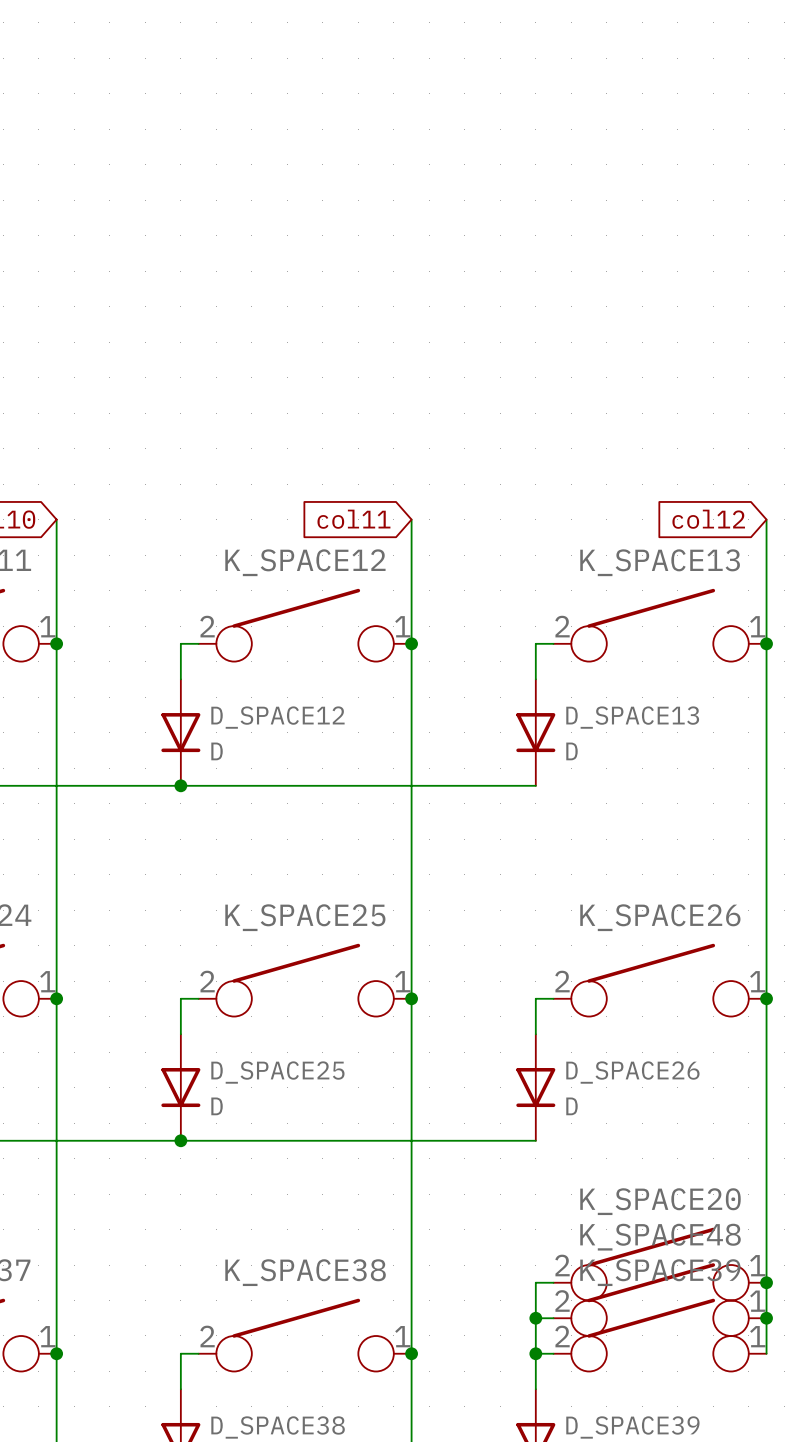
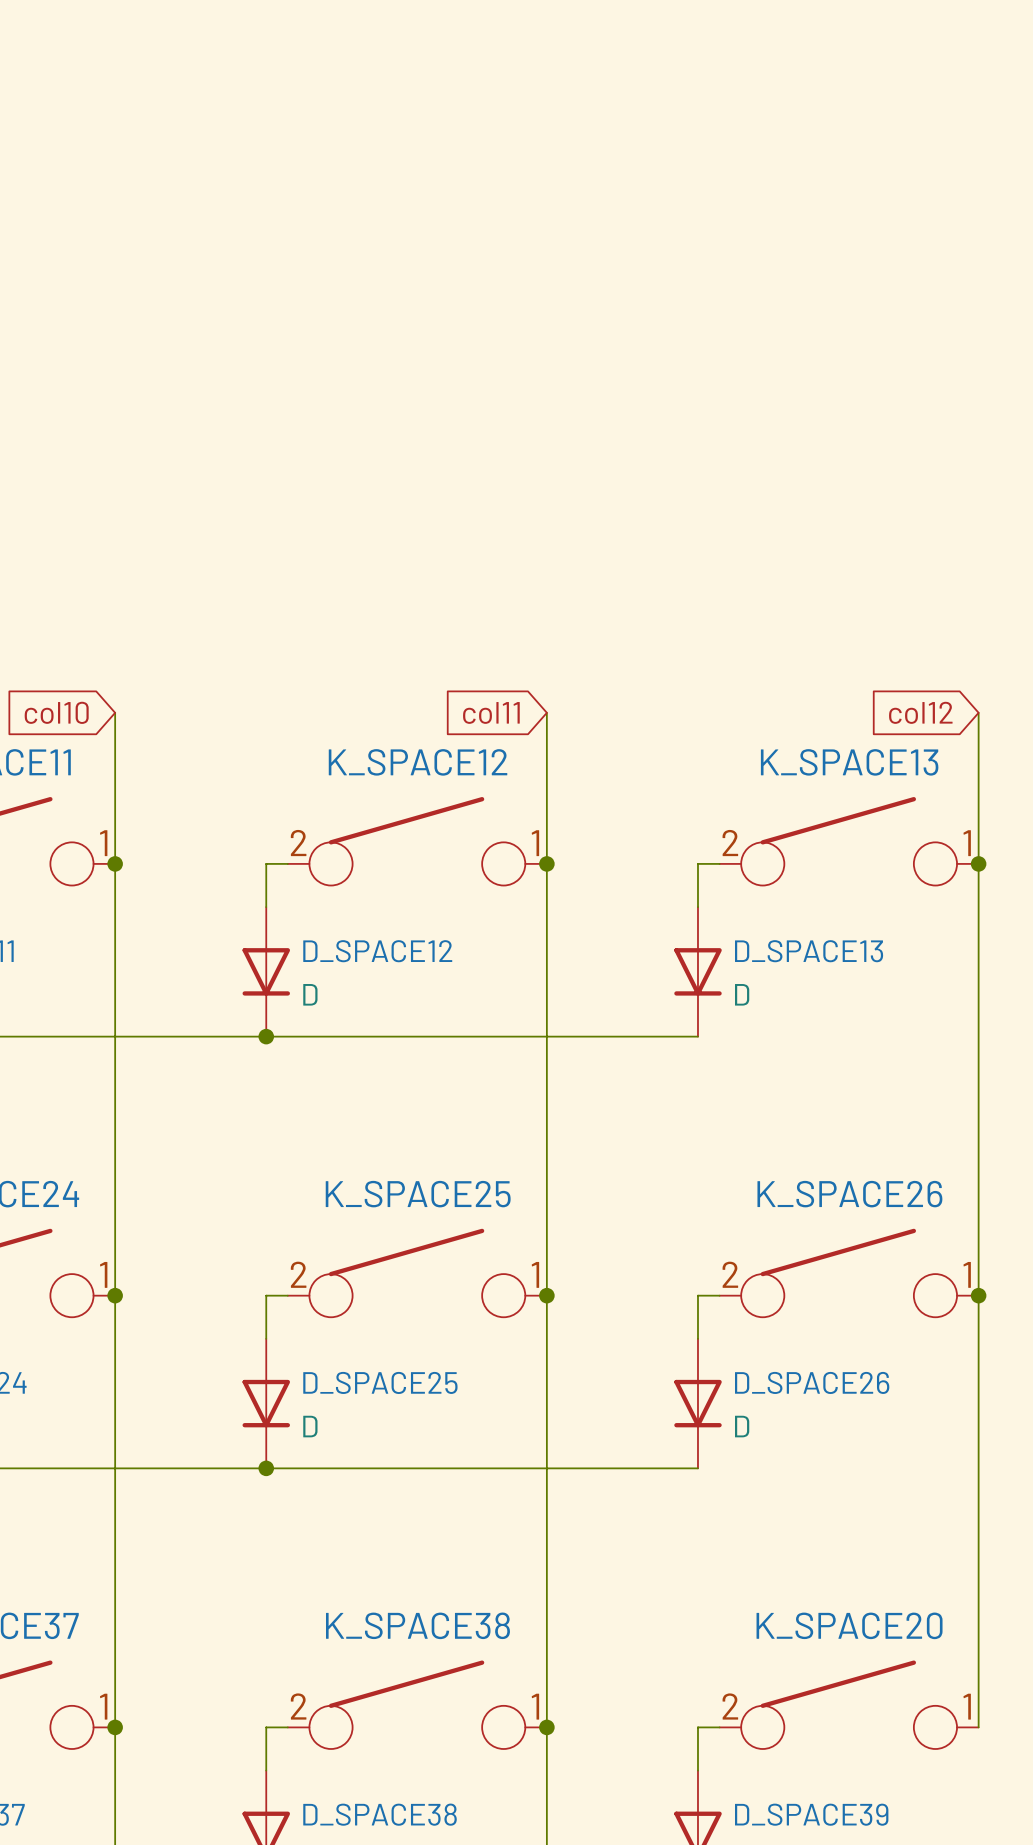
K_SPACE20: (660, 1264) -> none
K_SPACE39 name: K_SPACE39 (660, 1272) -> K_SPACE20 (849, 1625)
wire: (553, 1282) (535, 1282) (535, 1353) -> none
junction: (766, 1282) -> none
K_SPACE48: (660, 1299) -> none
wire: (535, 1318) (553, 1318) -> none
junction: (535, 1318) -> none
junction: (766, 1318) -> none
junction: (535, 1353) -> none

